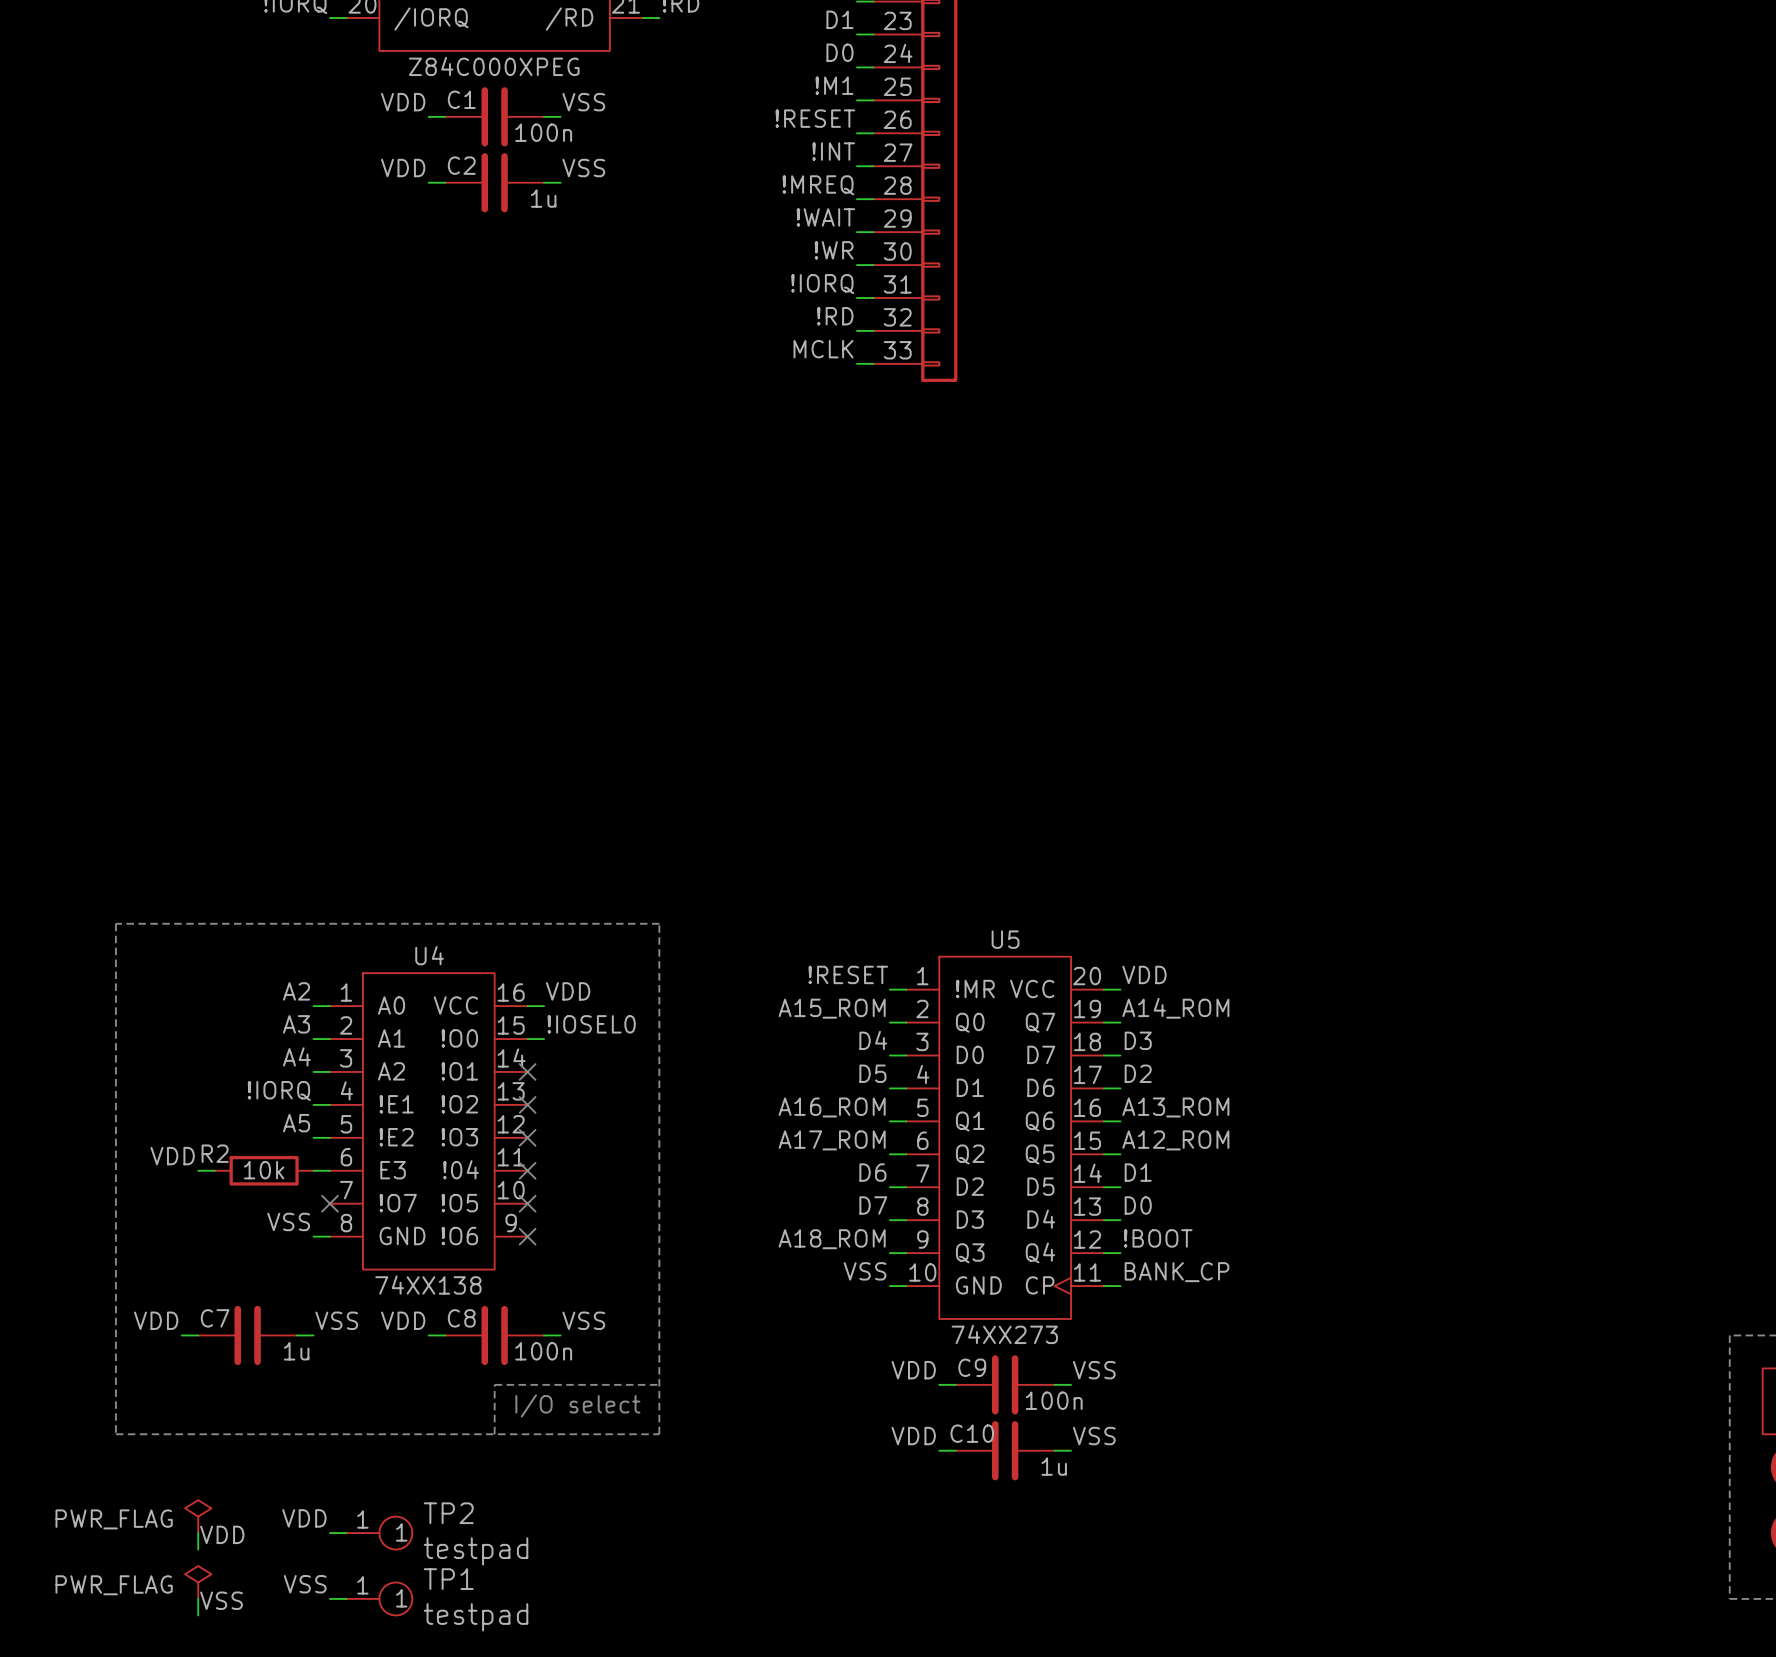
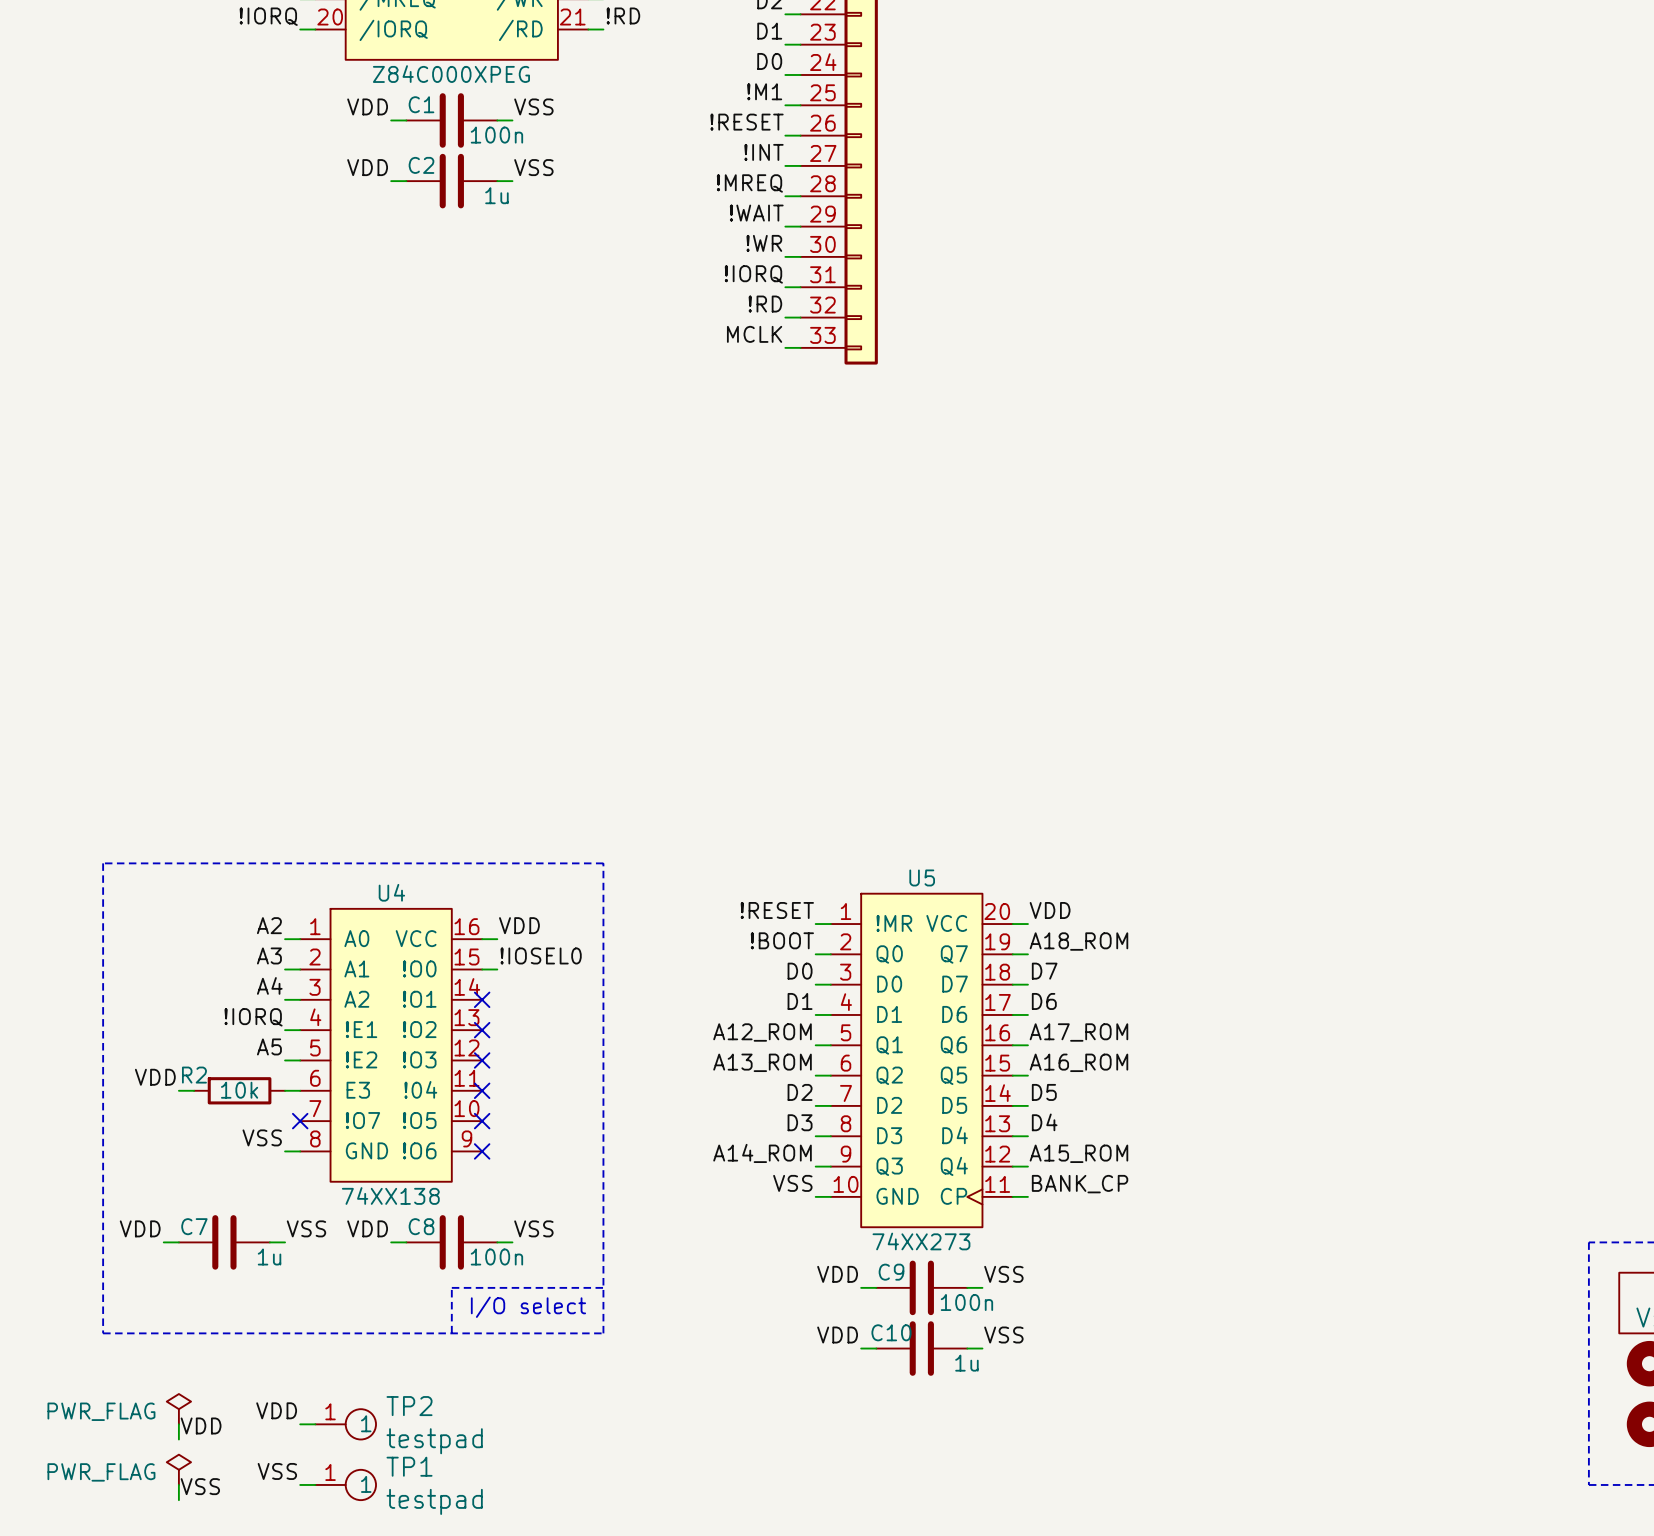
label: A15_ROM (832, 1008) -> !BOOT (782, 940)
label: A14_ROM (1175, 1008) -> A18_ROM (1078, 941)
label: D4 (873, 1040) -> D0 (800, 971)
label: D3 (1138, 1040) -> D7 (1044, 971)
label: D5 (872, 1073) -> D1 (800, 1001)
label: D2 (1138, 1073) -> D6 (1044, 1001)
label: A16_ROM (832, 1107) -> A12_ROM (762, 1032)
label: A13_ROM (1175, 1107) -> A17_ROM (1078, 1032)
label: A17_ROM (832, 1140) -> A13_ROM (762, 1062)
label: A12_ROM (1175, 1140) -> A16_ROM (1078, 1062)
label: D6 (872, 1172) -> D2 (800, 1092)
label: D1 (1138, 1172) -> D5 (1044, 1092)
label: D7 (873, 1205) -> D3 (800, 1122)
label: D0 (1138, 1205) -> D4 (1044, 1122)
label: !BOOT (1158, 1238) -> A15_ROM (1078, 1153)
label: A18_ROM (832, 1239) -> A14_ROM (762, 1153)

